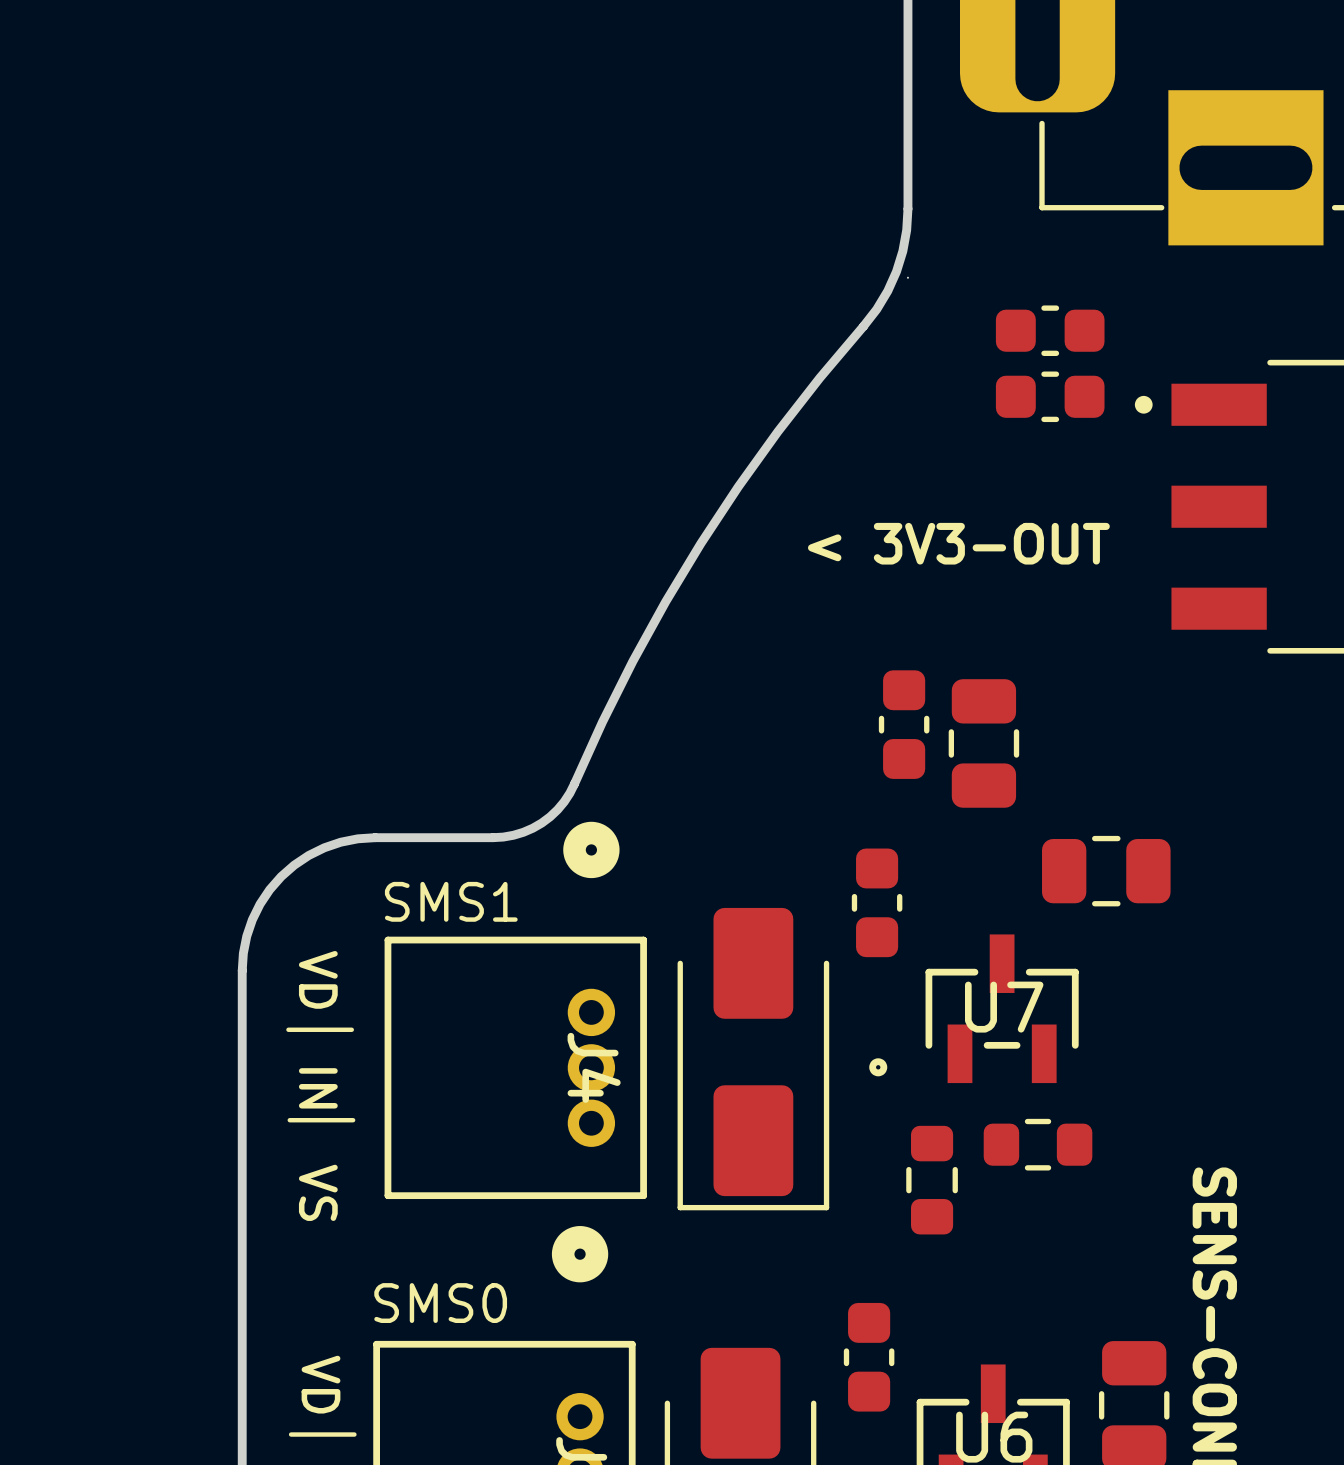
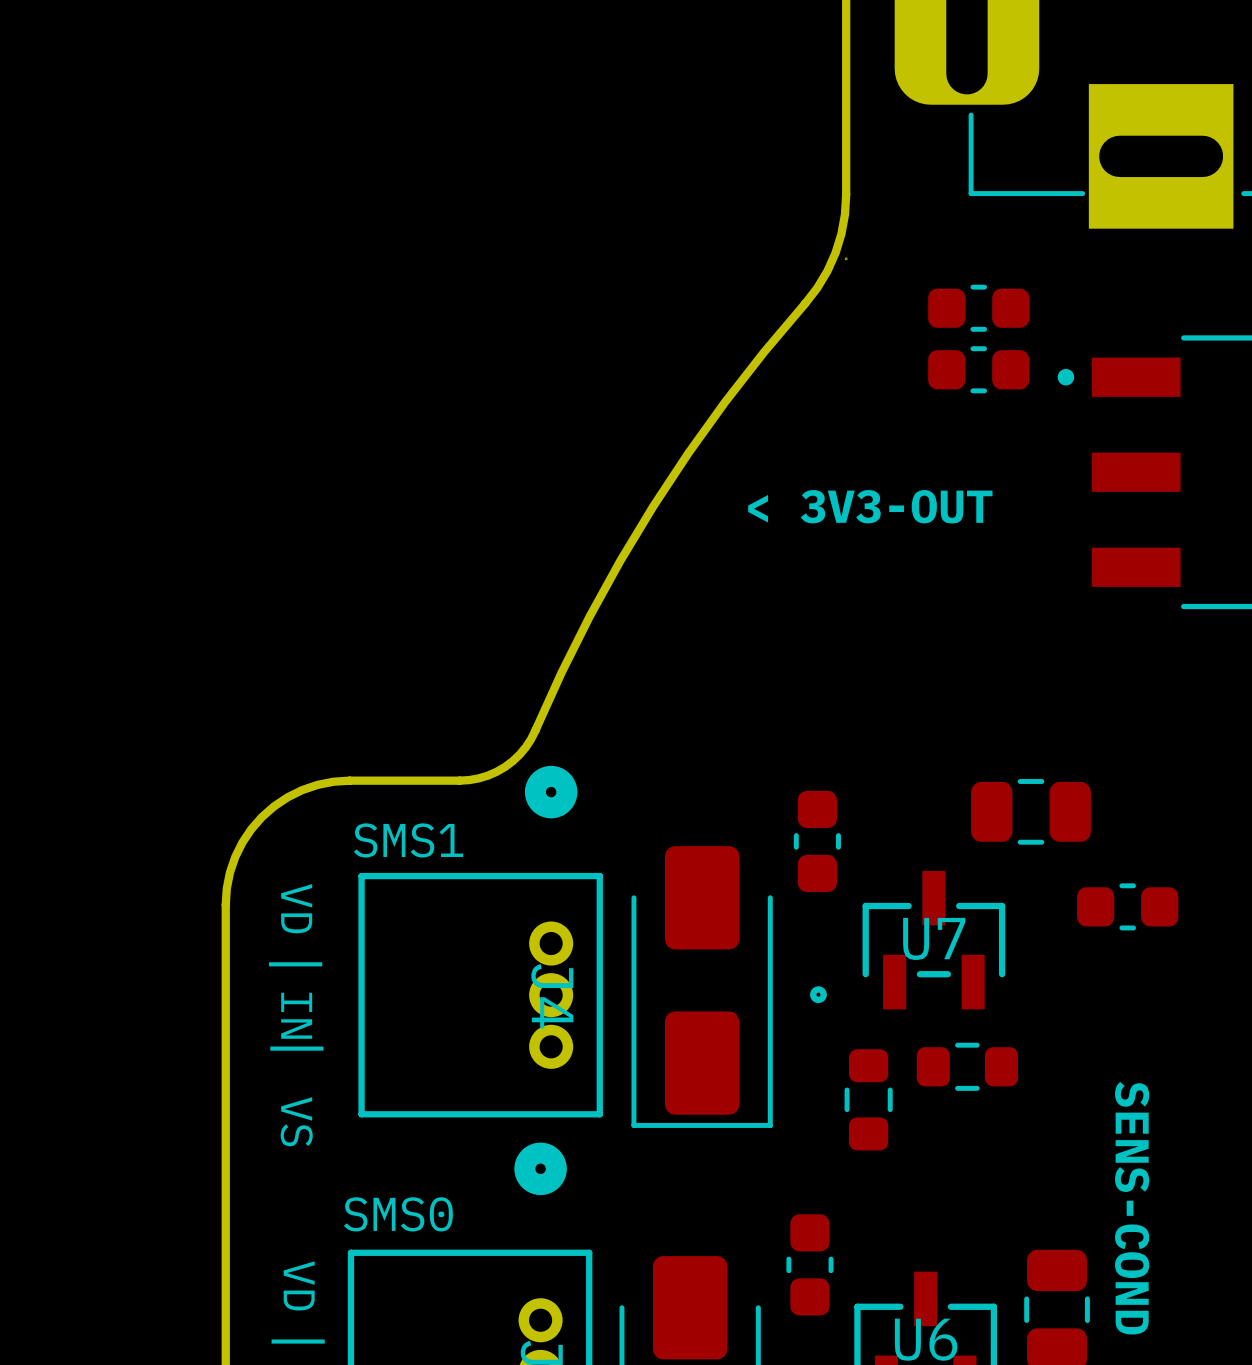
part rotation: 0° (904, 724) -> 90° clockwise (1127, 906)
part position: (904, 724) -> (1127, 906)
part: (983, 743) -> none

